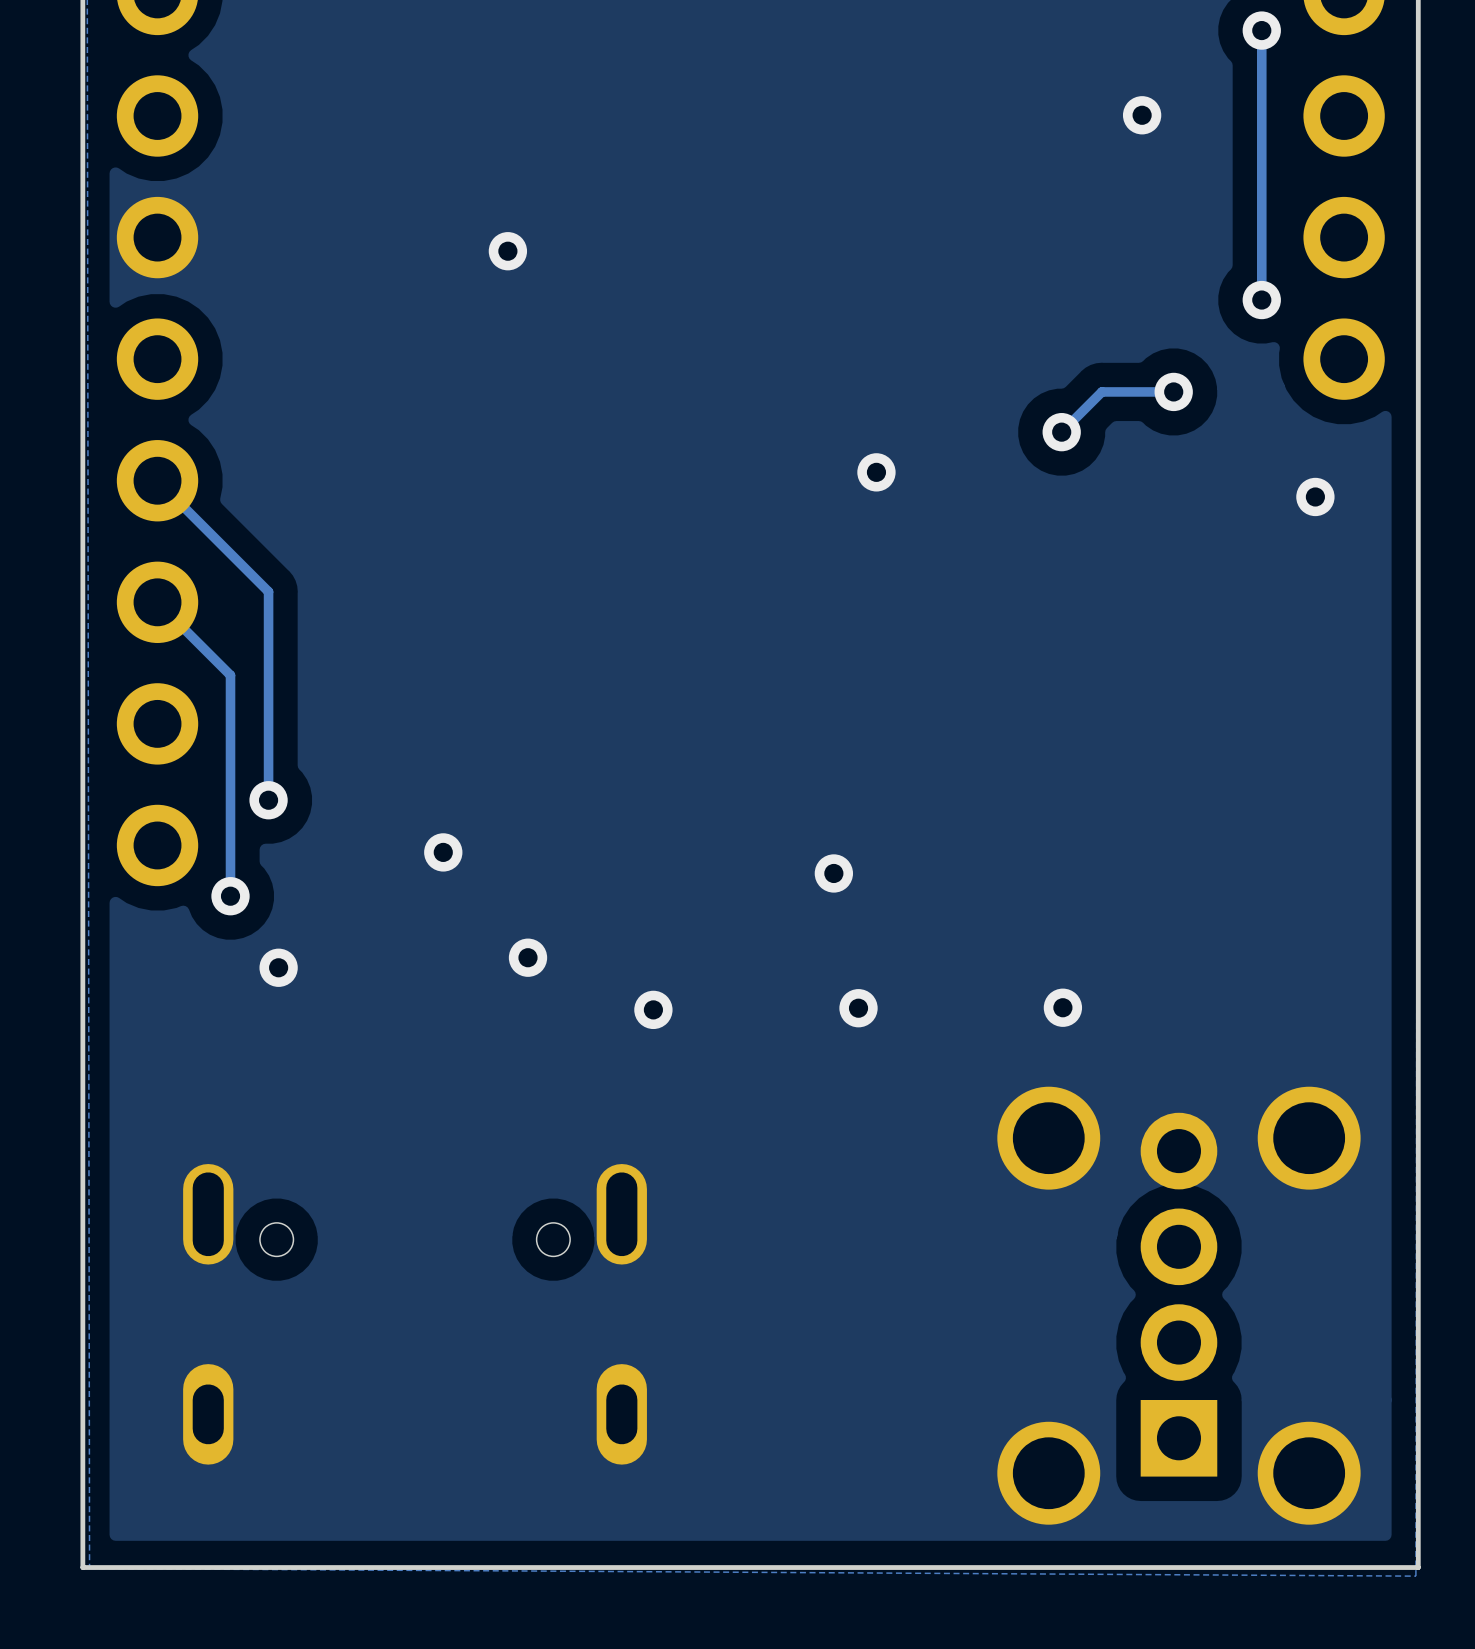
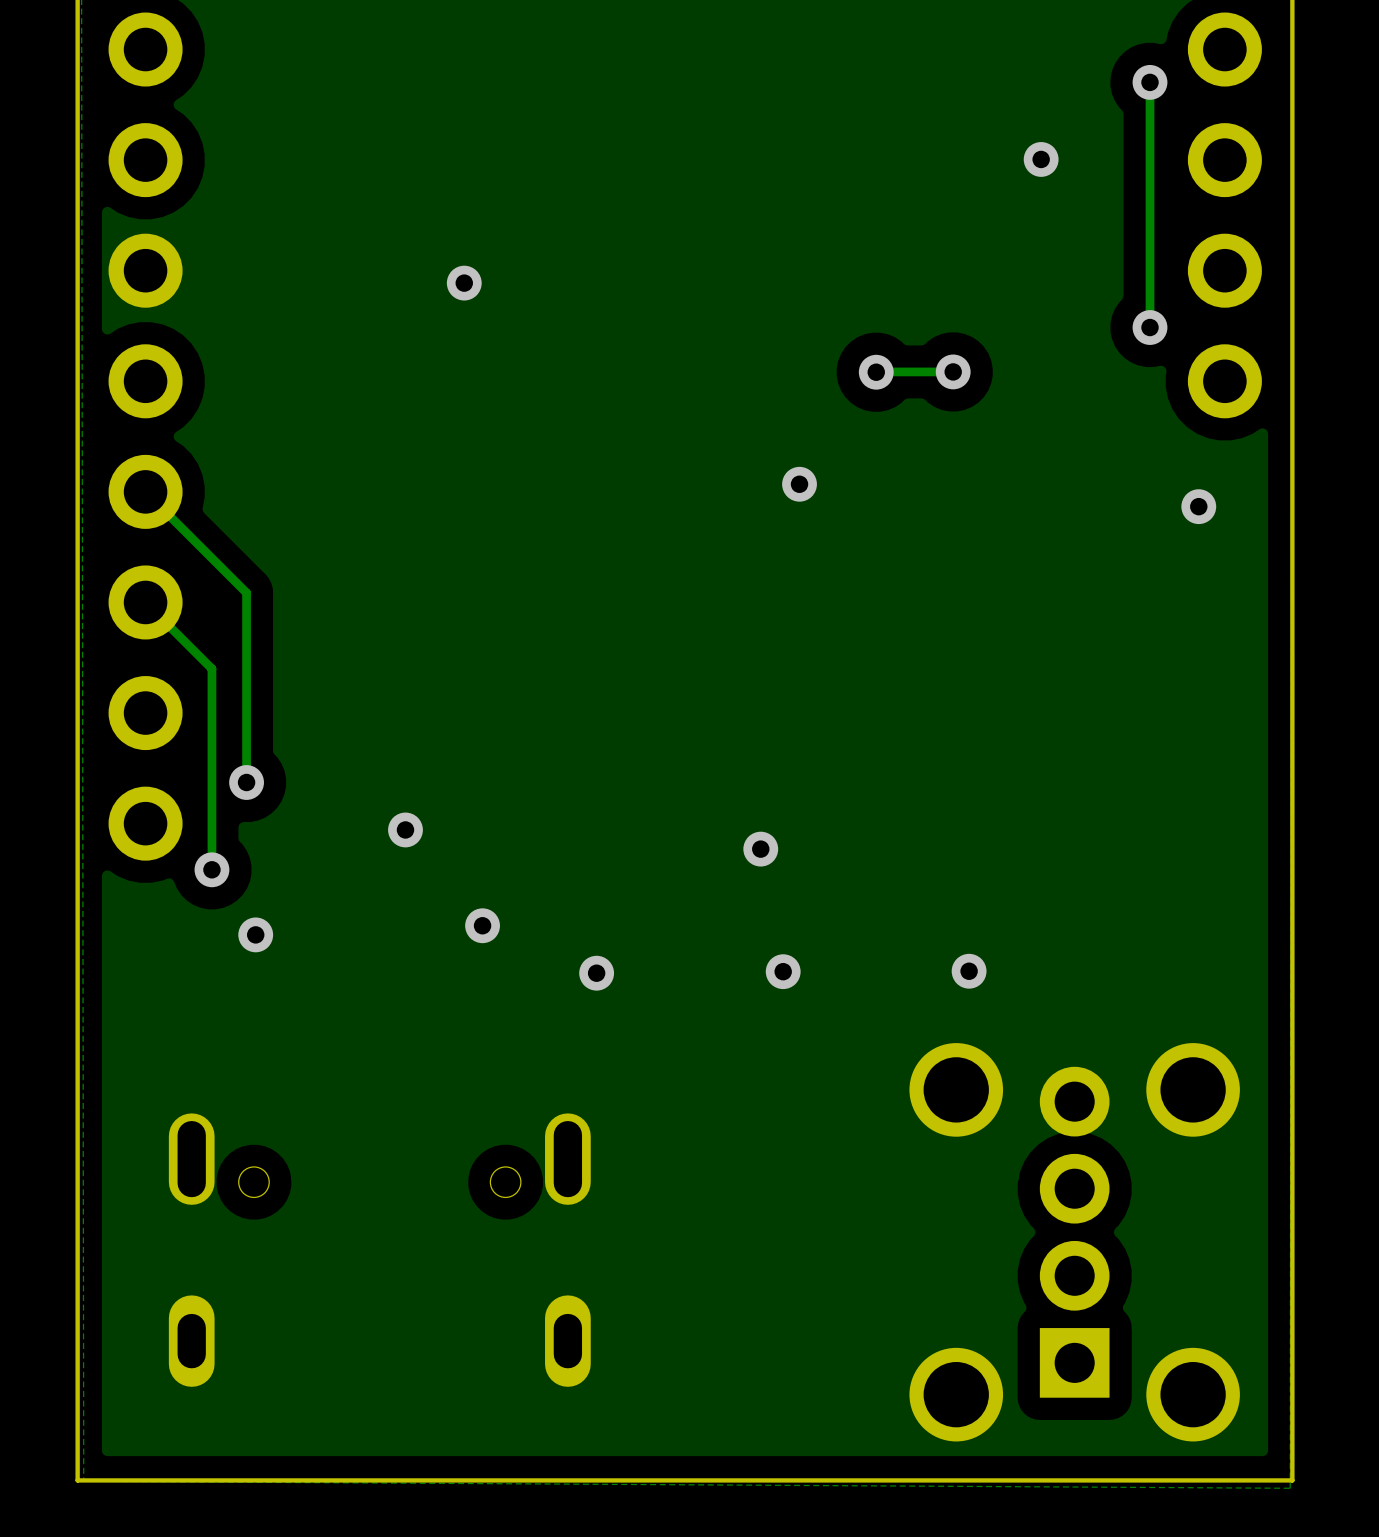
track: none -> (953, 371) (876, 371)
via: none -> (953, 371)
via: none -> (876, 372)
track: (1173, 391) (1101, 391) (1061, 432) -> none
via: (1173, 391) -> none
via: (1061, 432) -> none

